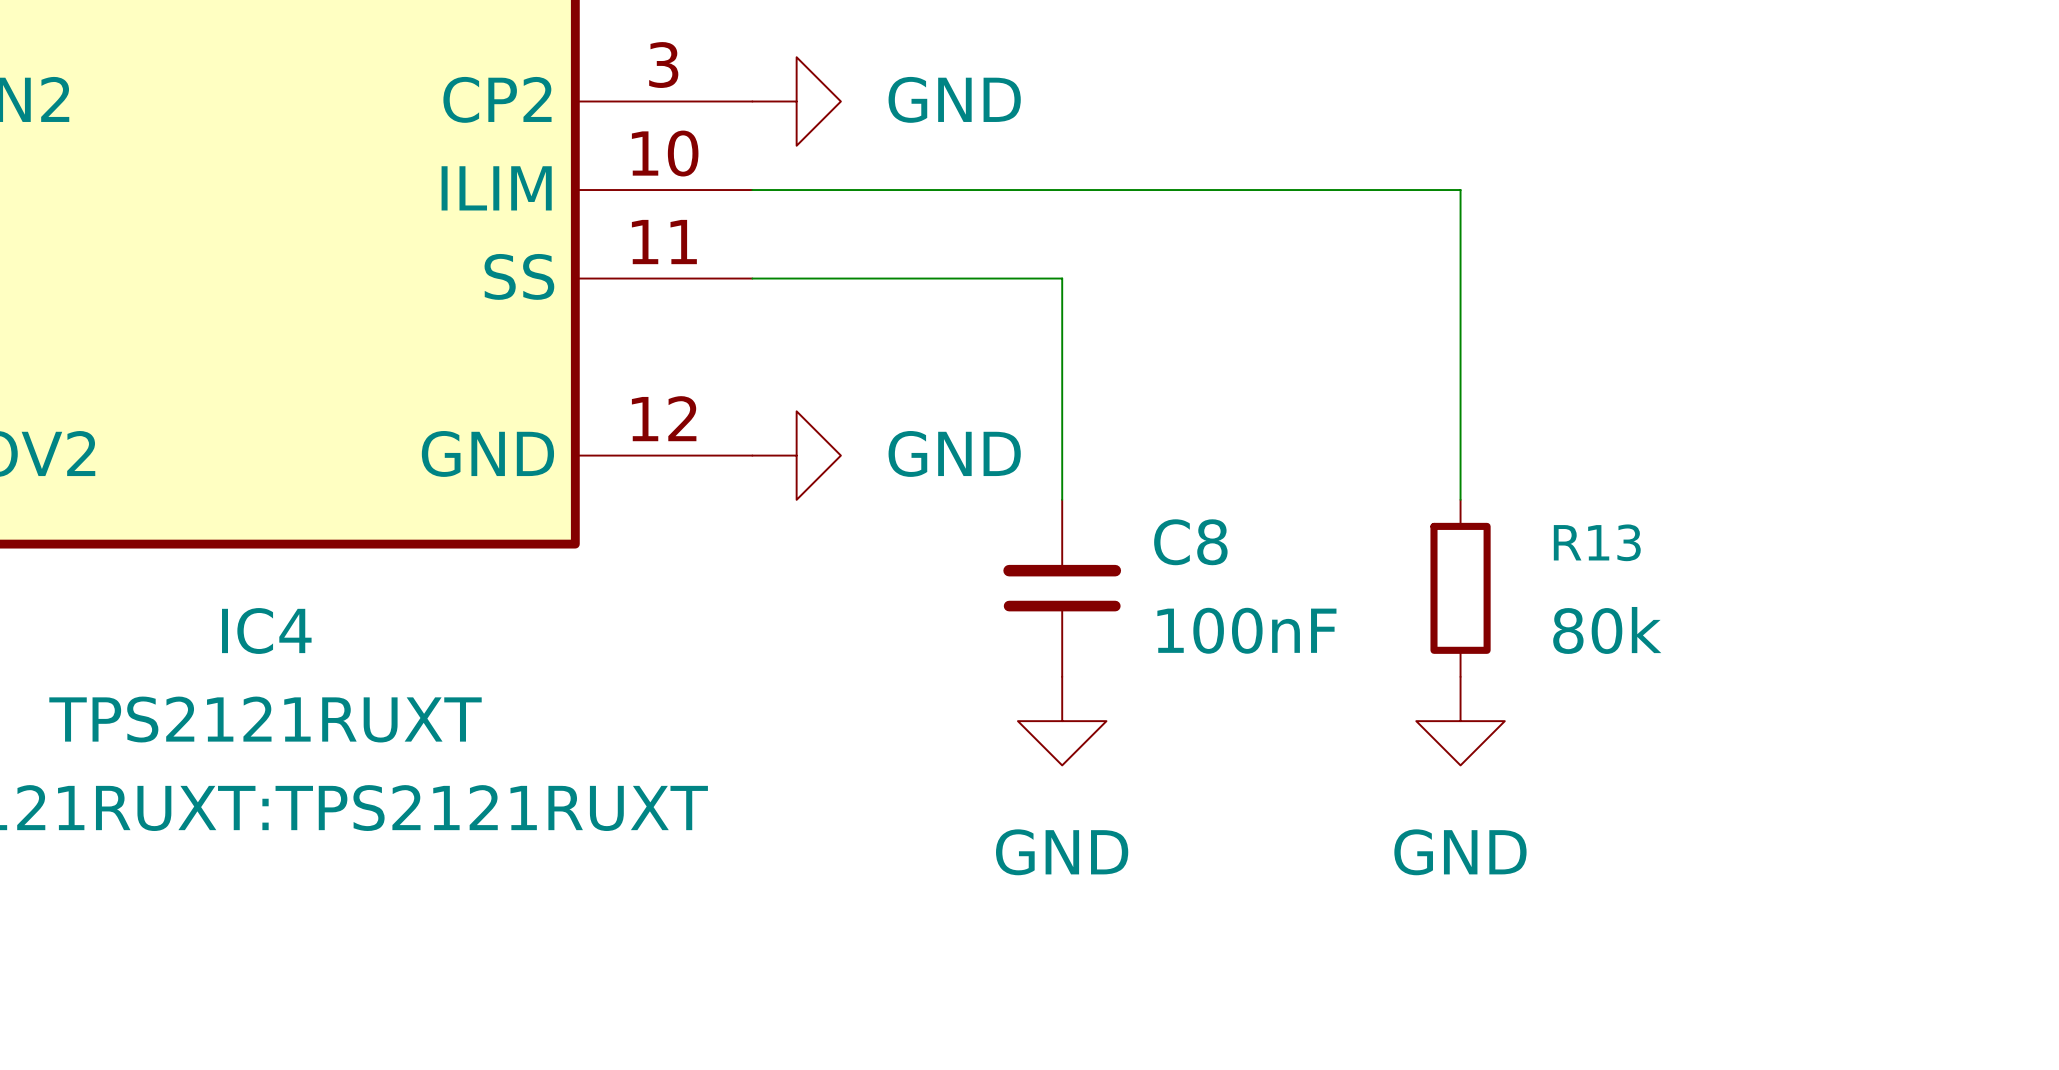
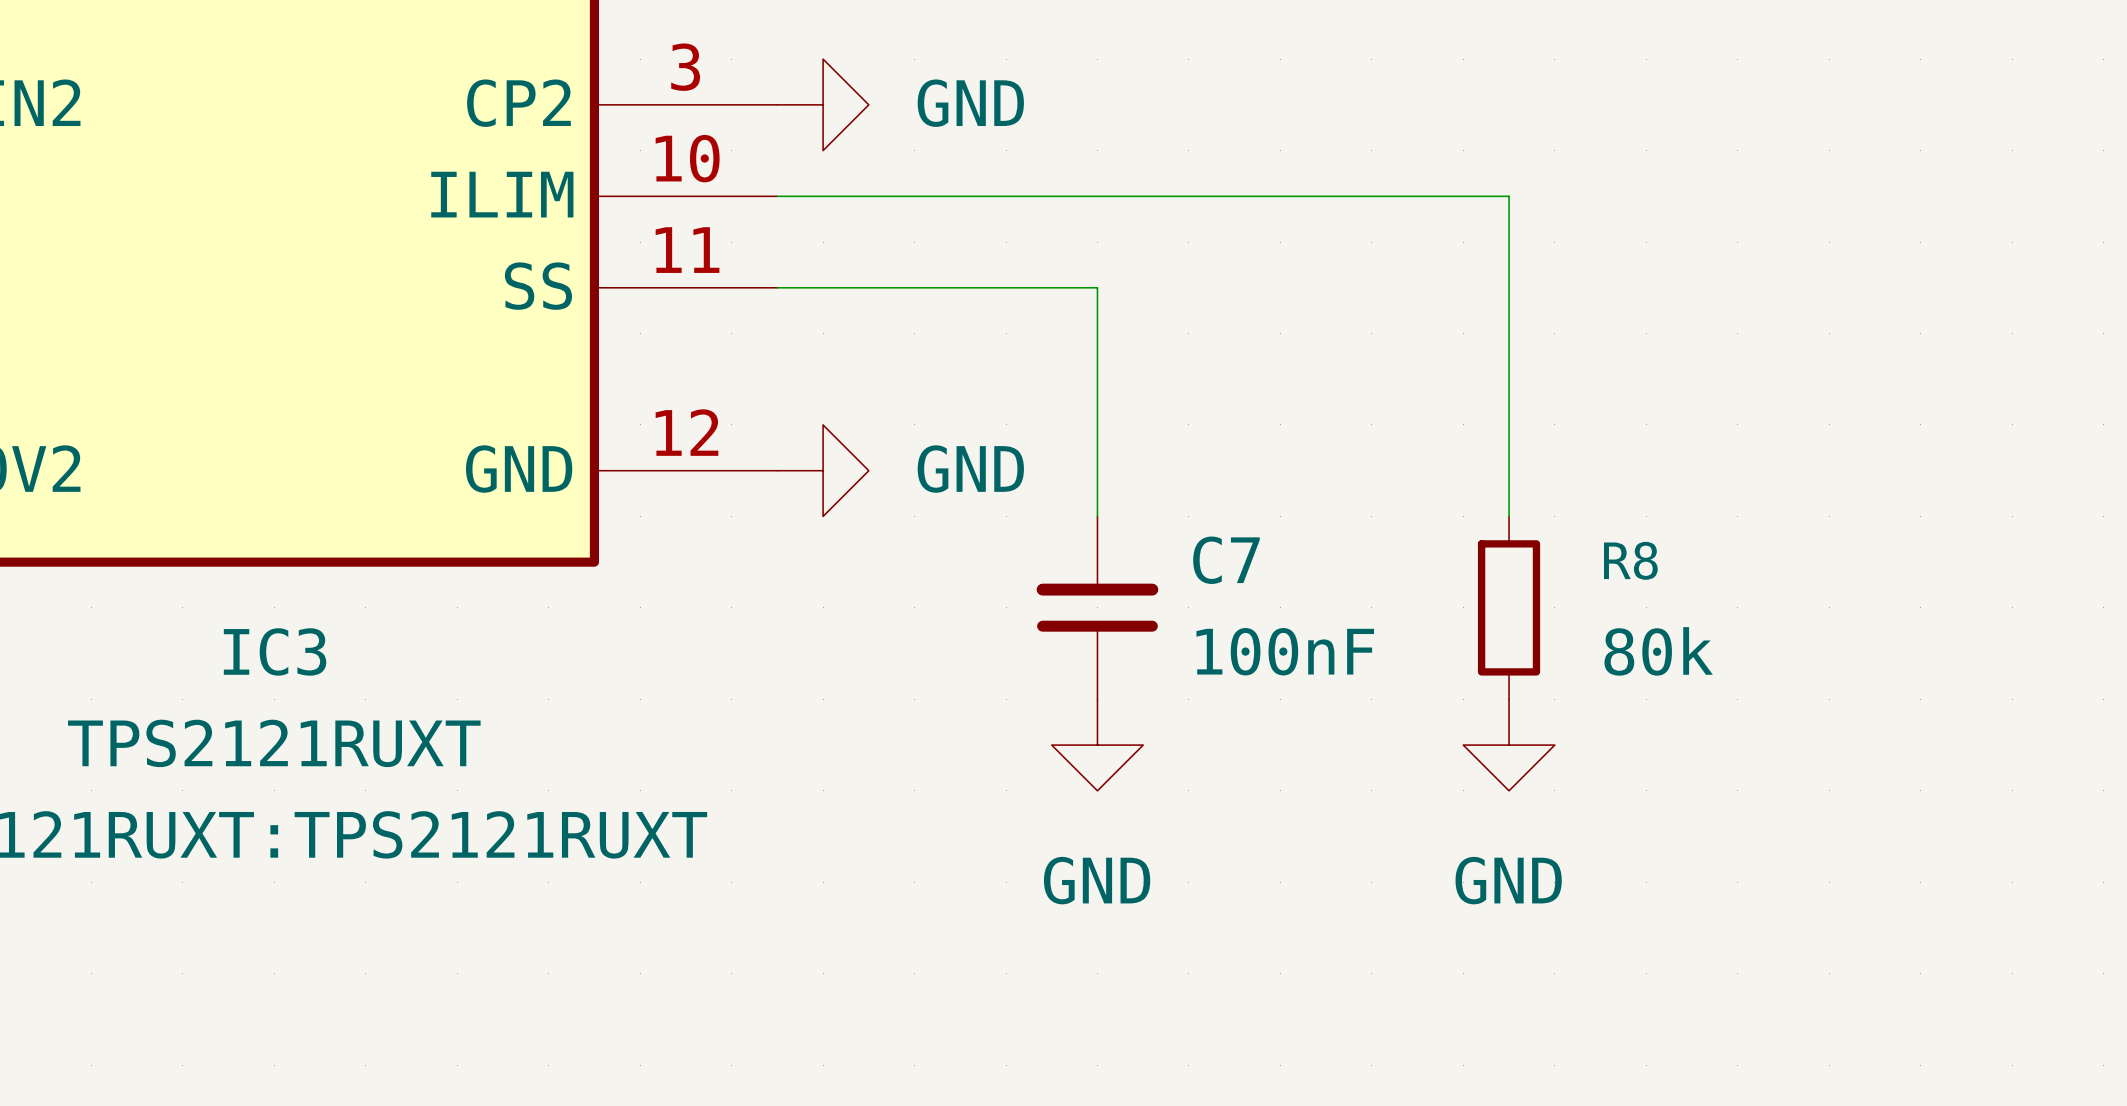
C8 name: C8 (1190, 542) -> C7 (1226, 560)
R13 name: R13 (1597, 542) -> R8 (1630, 560)
IC4 name: IC4 (266, 631) -> IC3 (275, 651)

